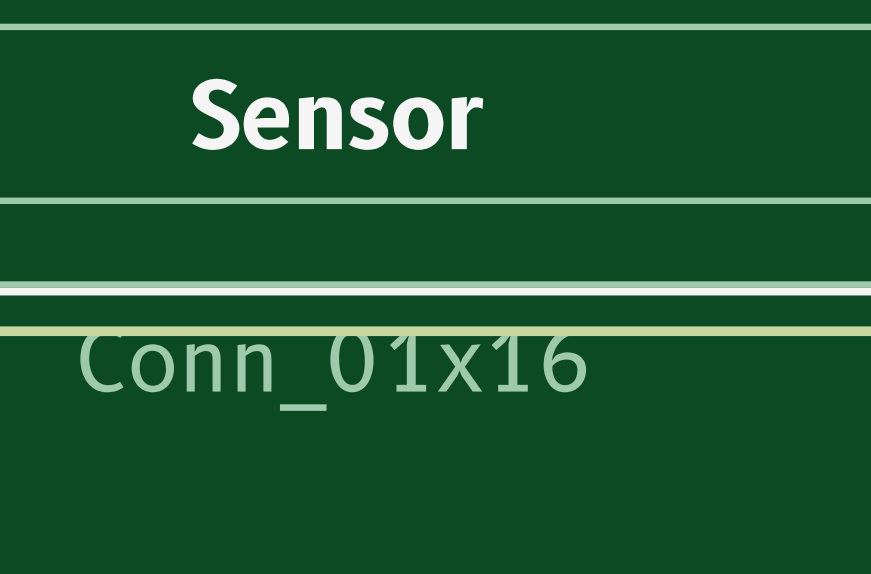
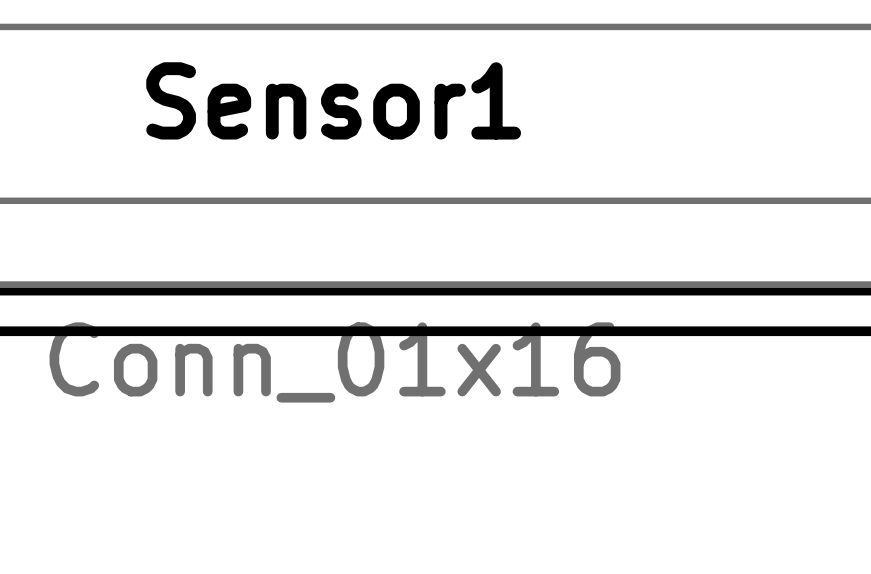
Sensor name: Sensor (337, 114) -> Sensor1 (333, 100)

